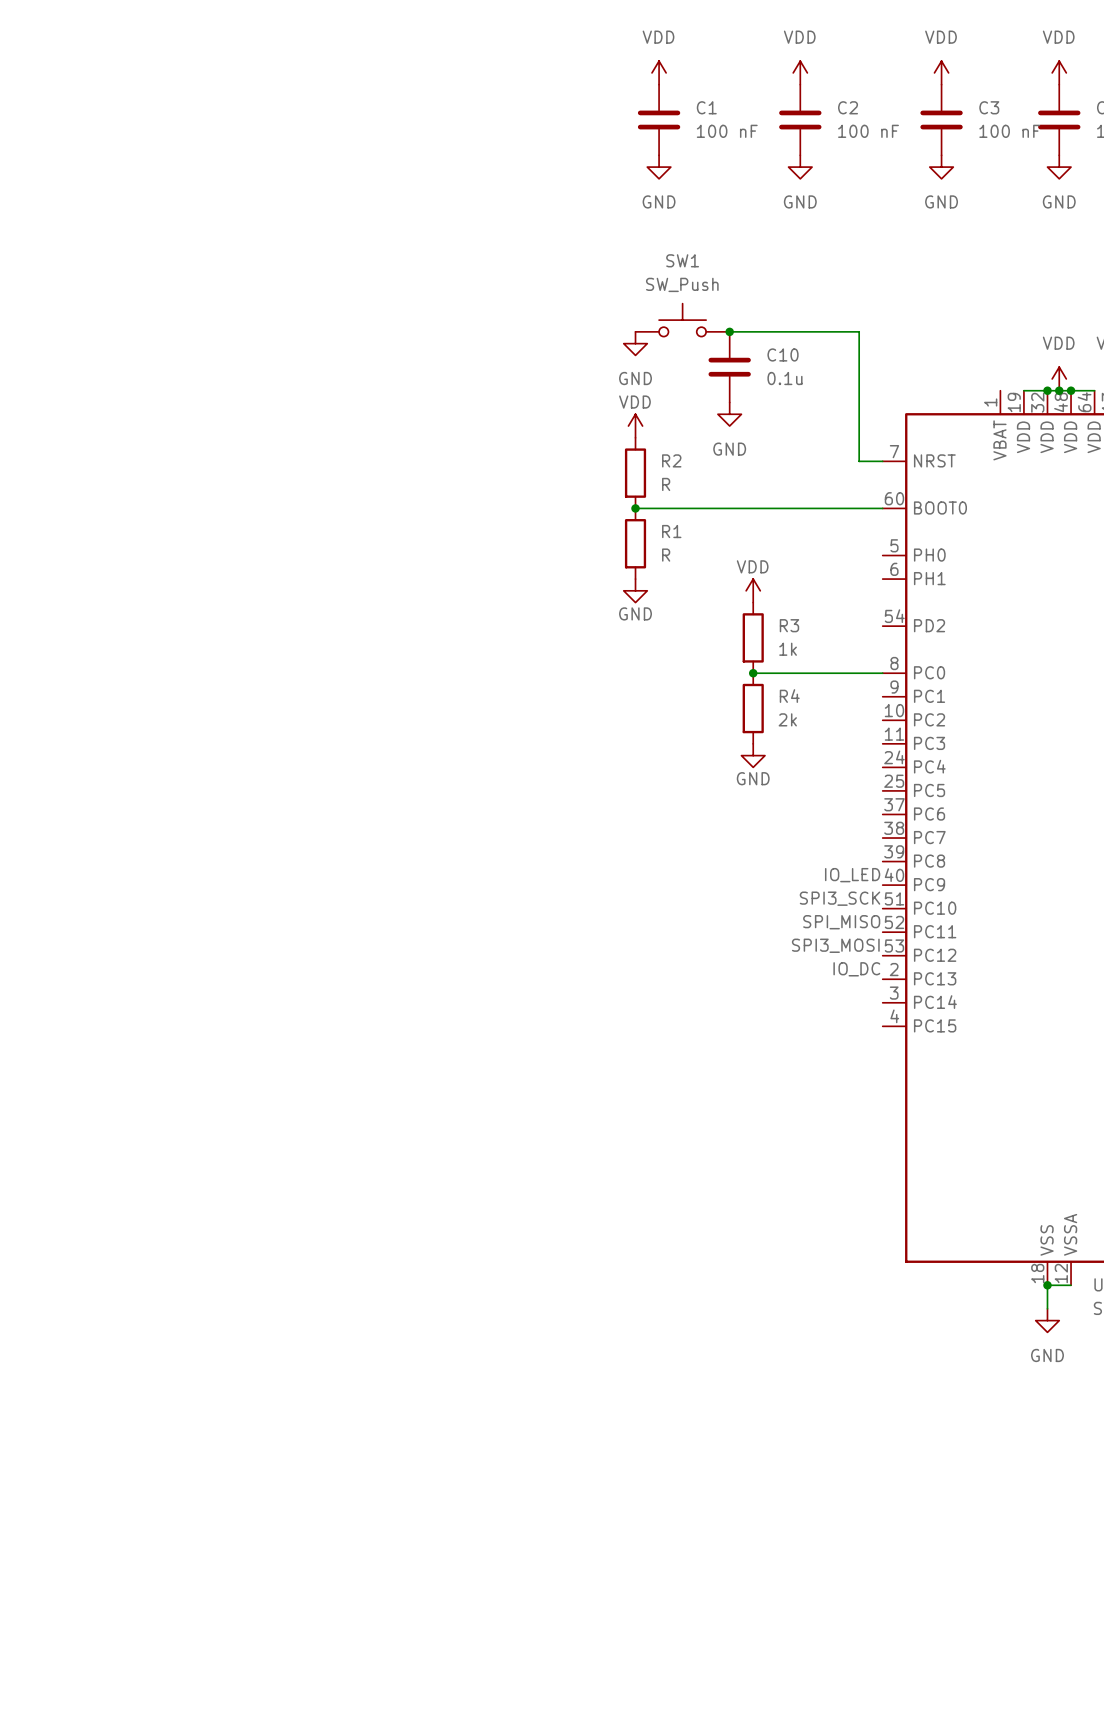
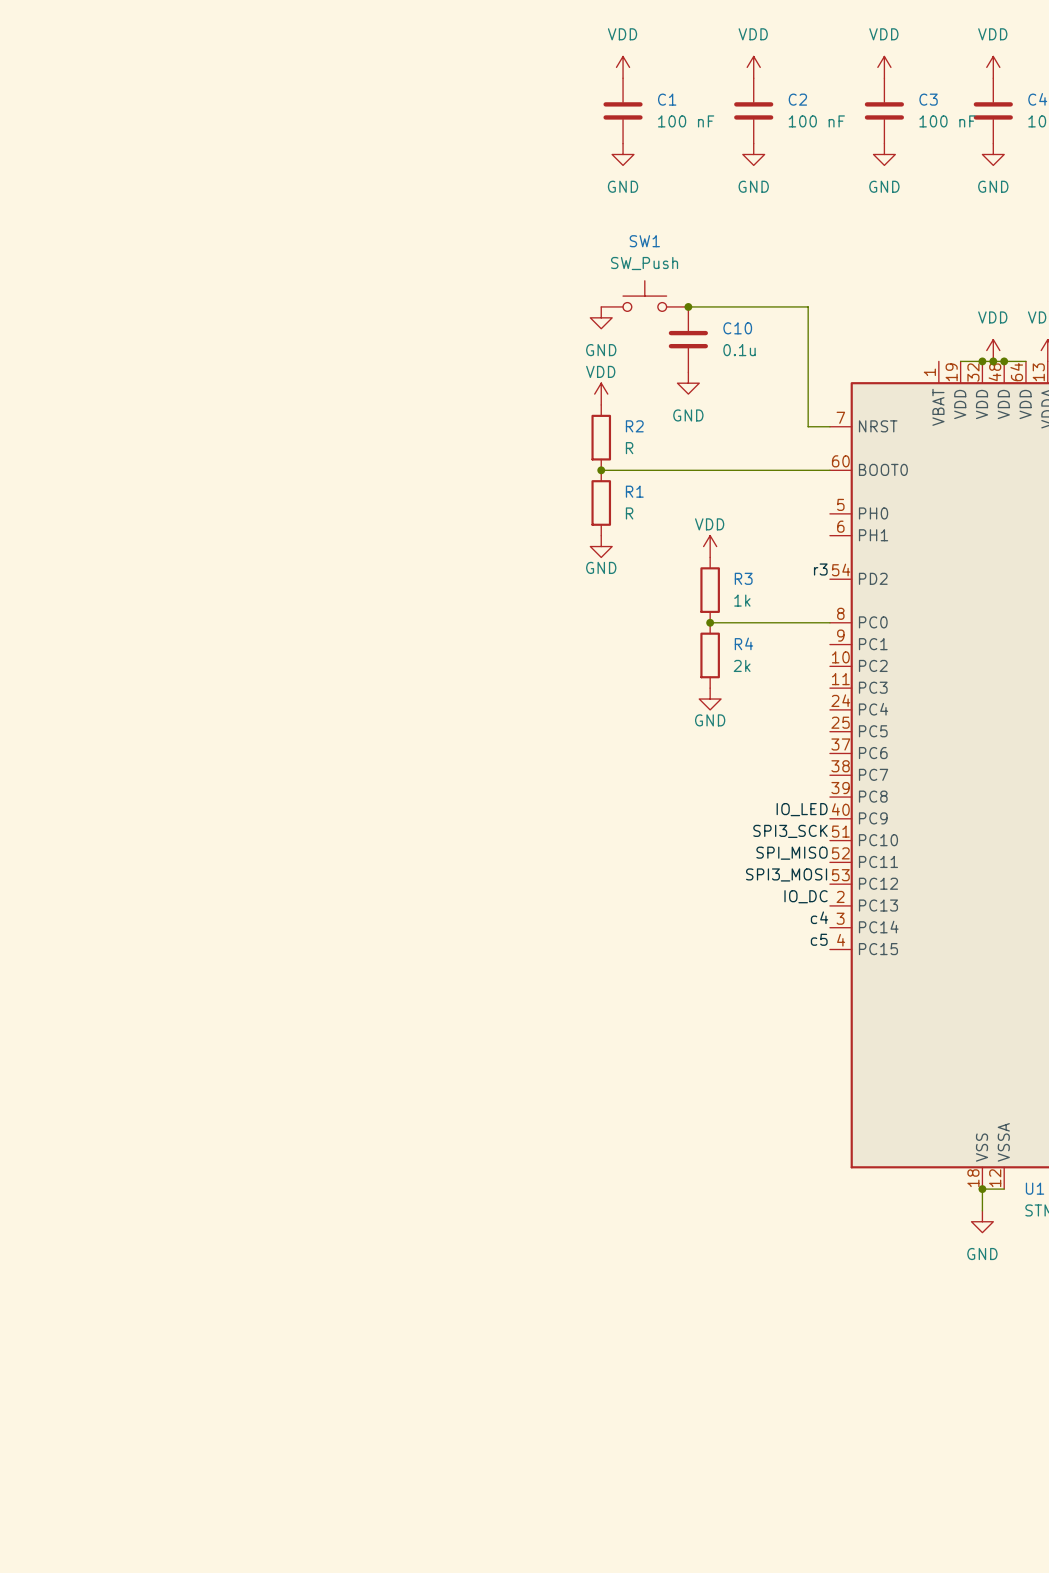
label: none -> r3 (820, 569)
label: none -> c4 (819, 917)
label: none -> c5 (819, 939)

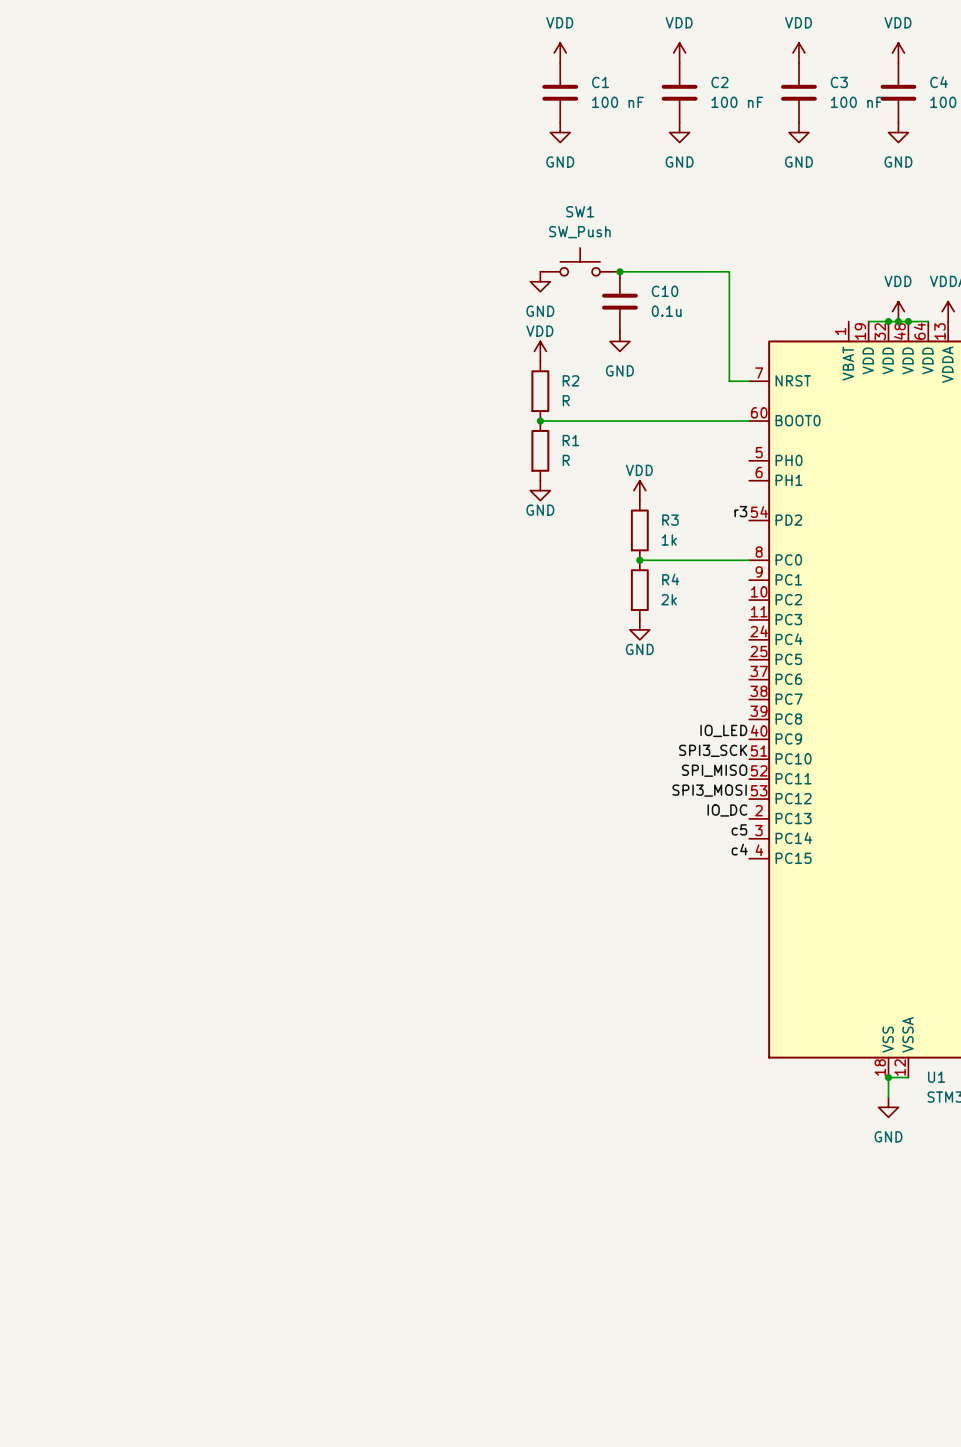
label: c4 (819, 917) -> c5 (739, 829)
label: c5 (819, 939) -> c4 (739, 849)

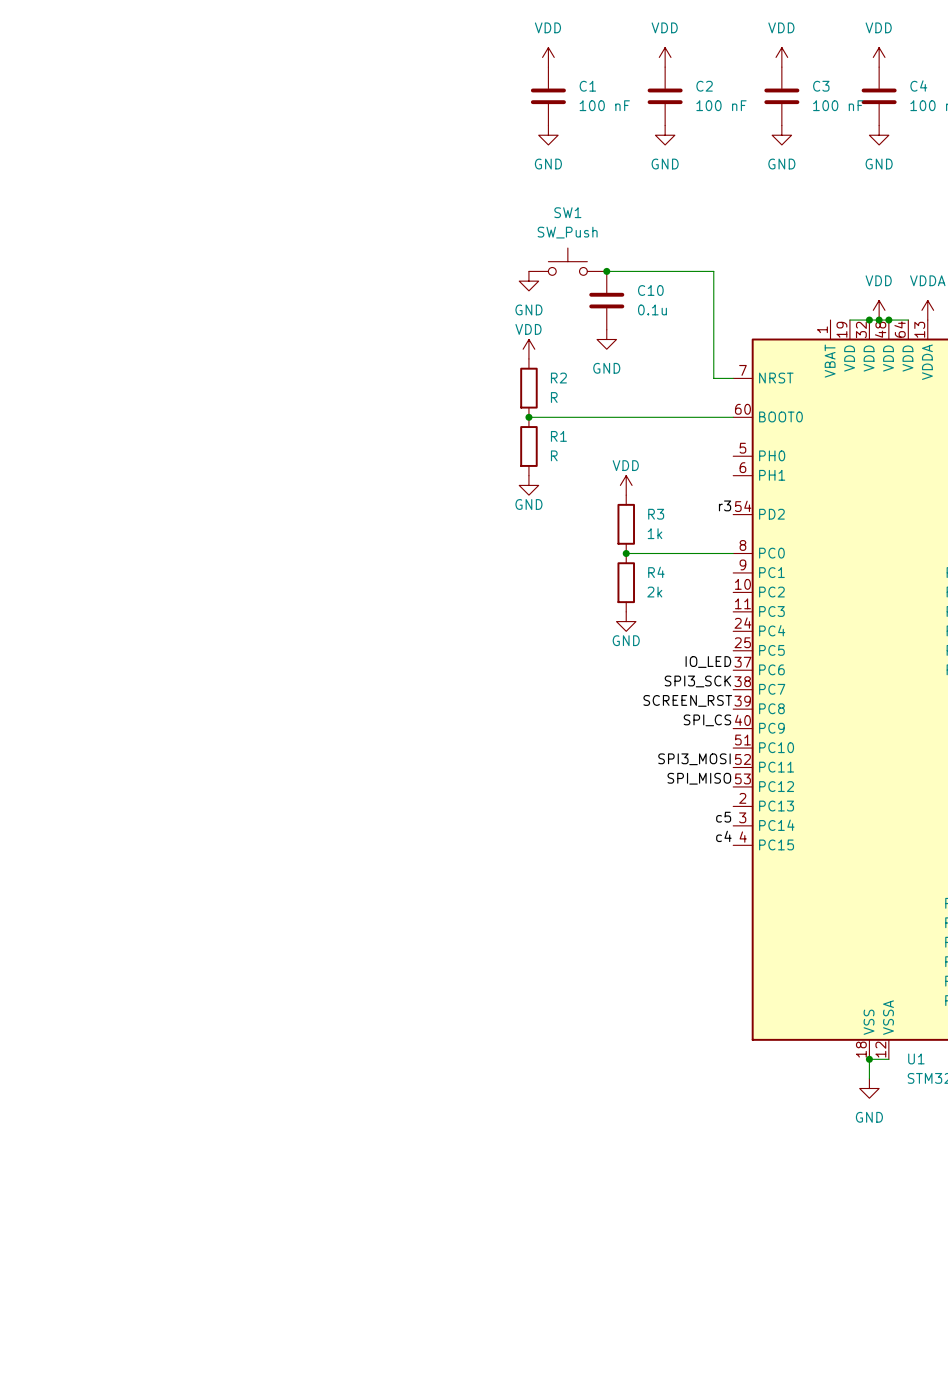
label: none -> IO_LED (708, 662)
label: none -> SCREEN_RST (687, 700)
label: IO_LED (723, 730) -> SPI_CS (707, 720)
label position: SPI3_SCK (713, 750) -> SPI3_SCK (697, 681)
label: SPI_MISO (714, 770) -> SPI3_MOSI (694, 759)
label: SPI3_MOSI (709, 790) -> SPI_MISO (699, 778)
label: IO_DC (727, 810) -> none

